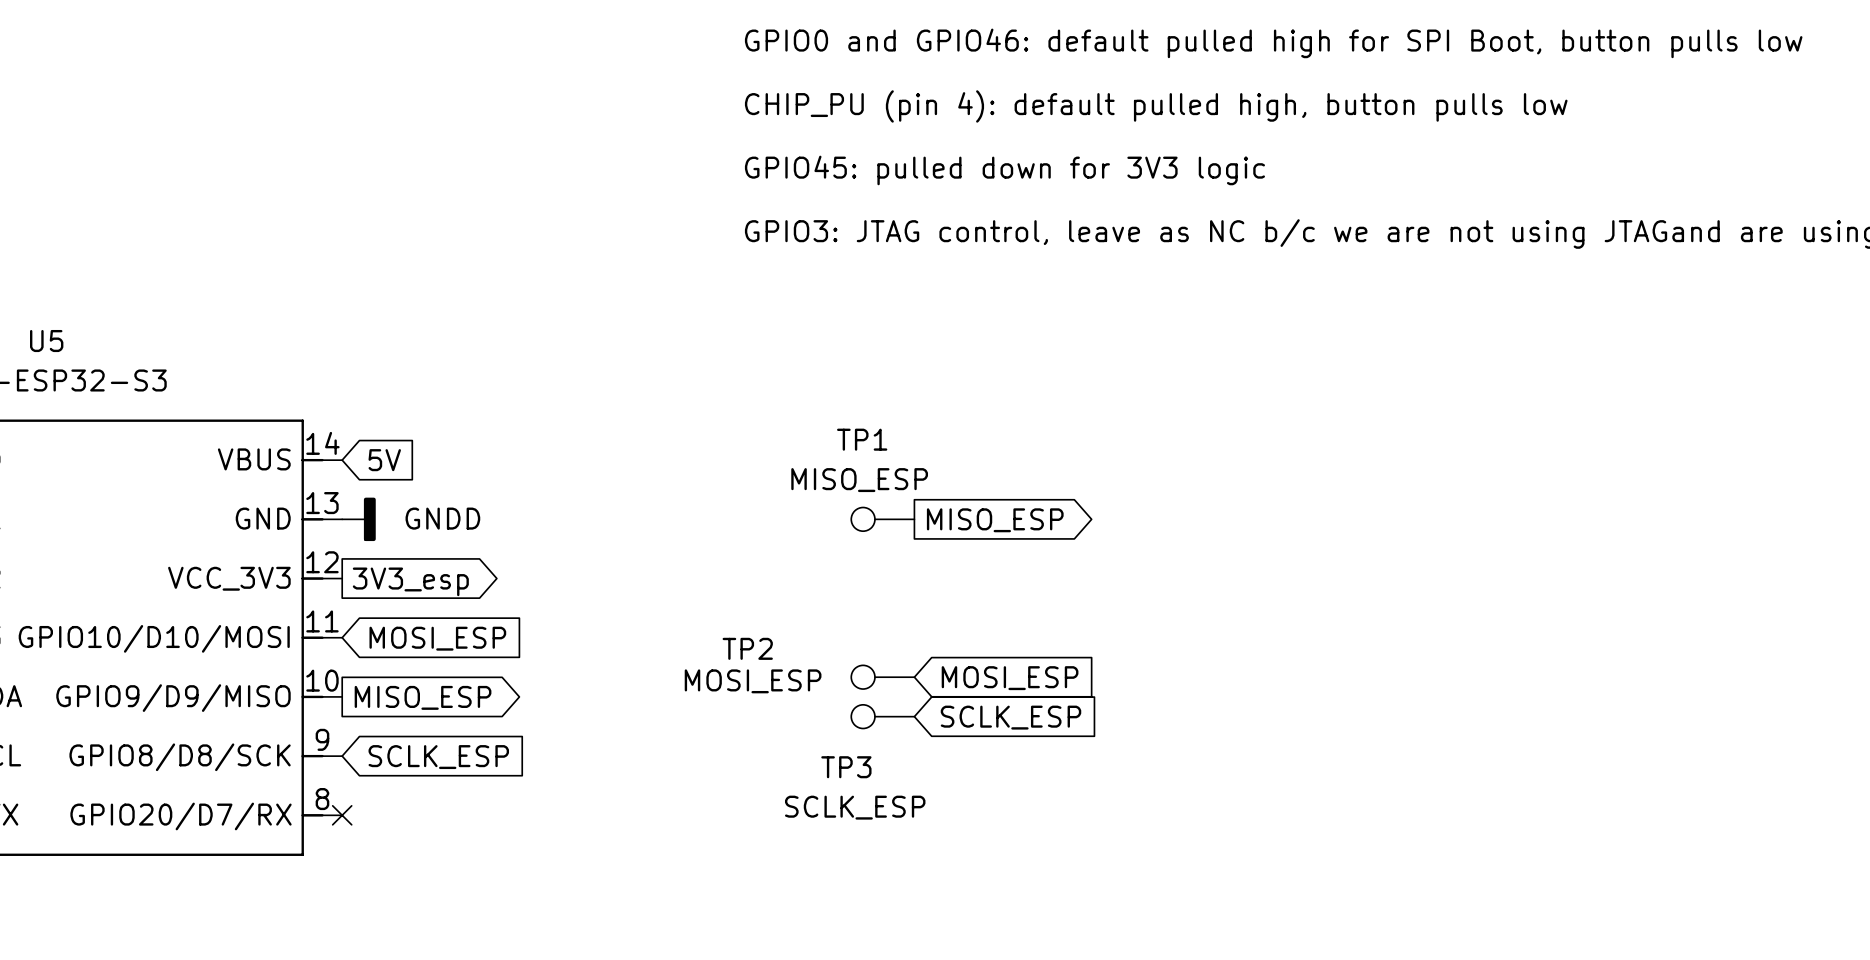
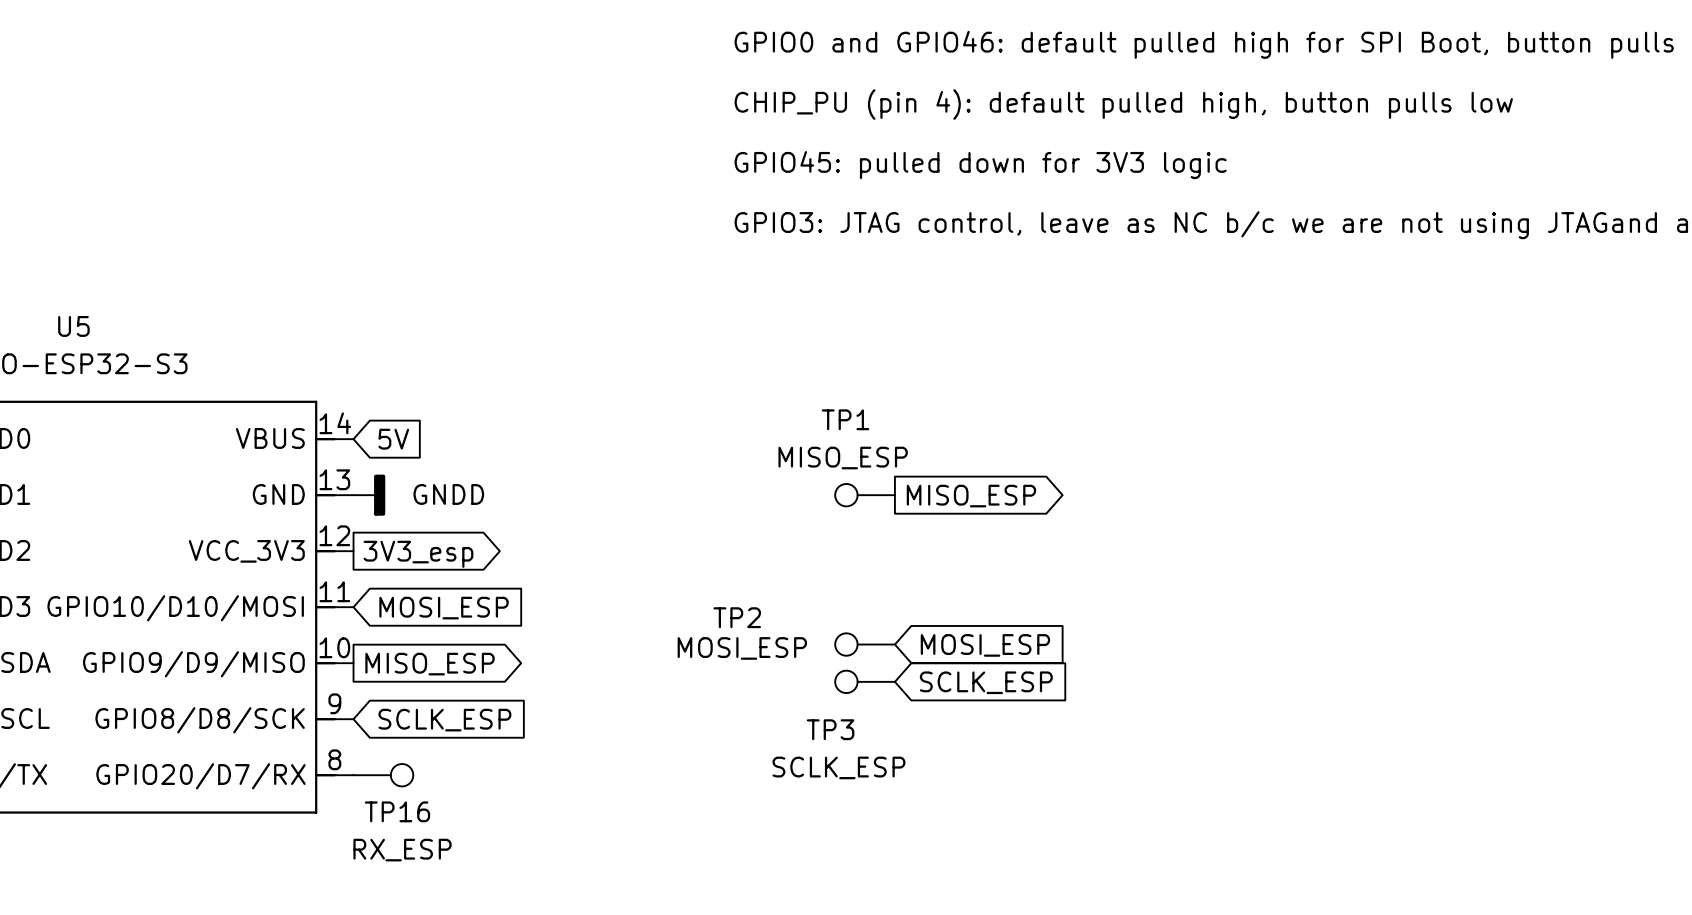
no-connect mark: (342, 815) -> none
TP16: none -> RX_ESP (383, 775)

